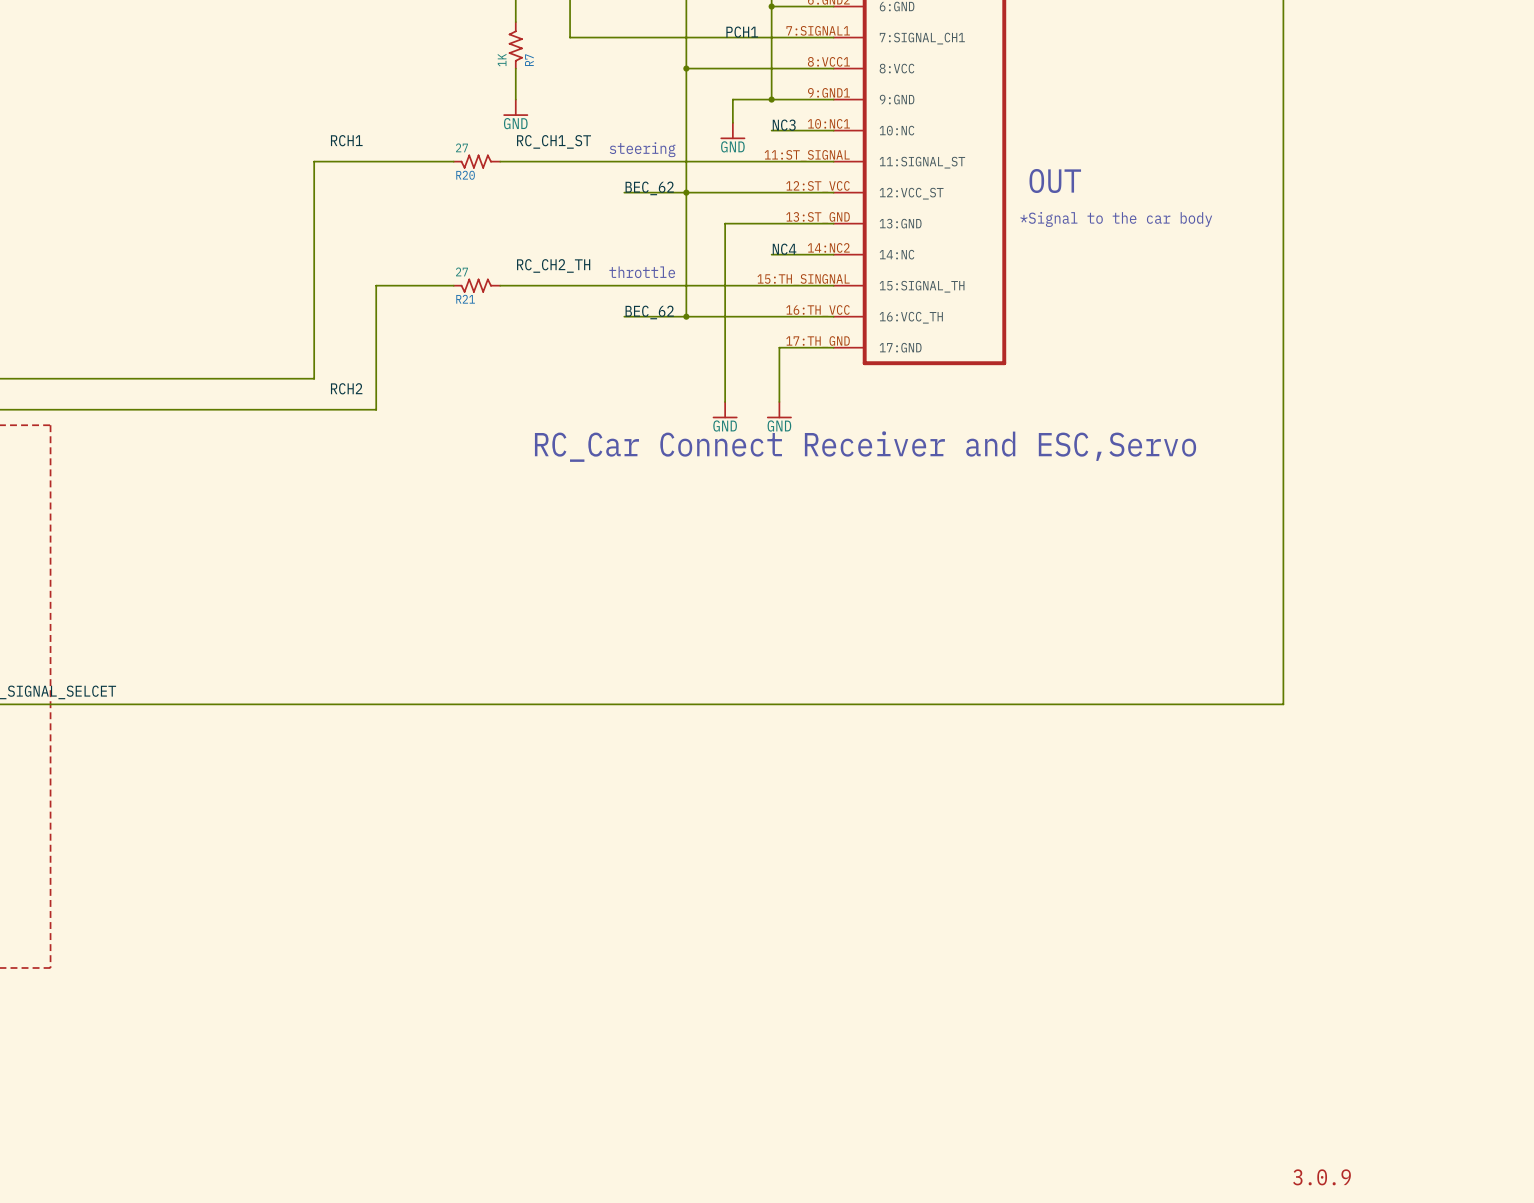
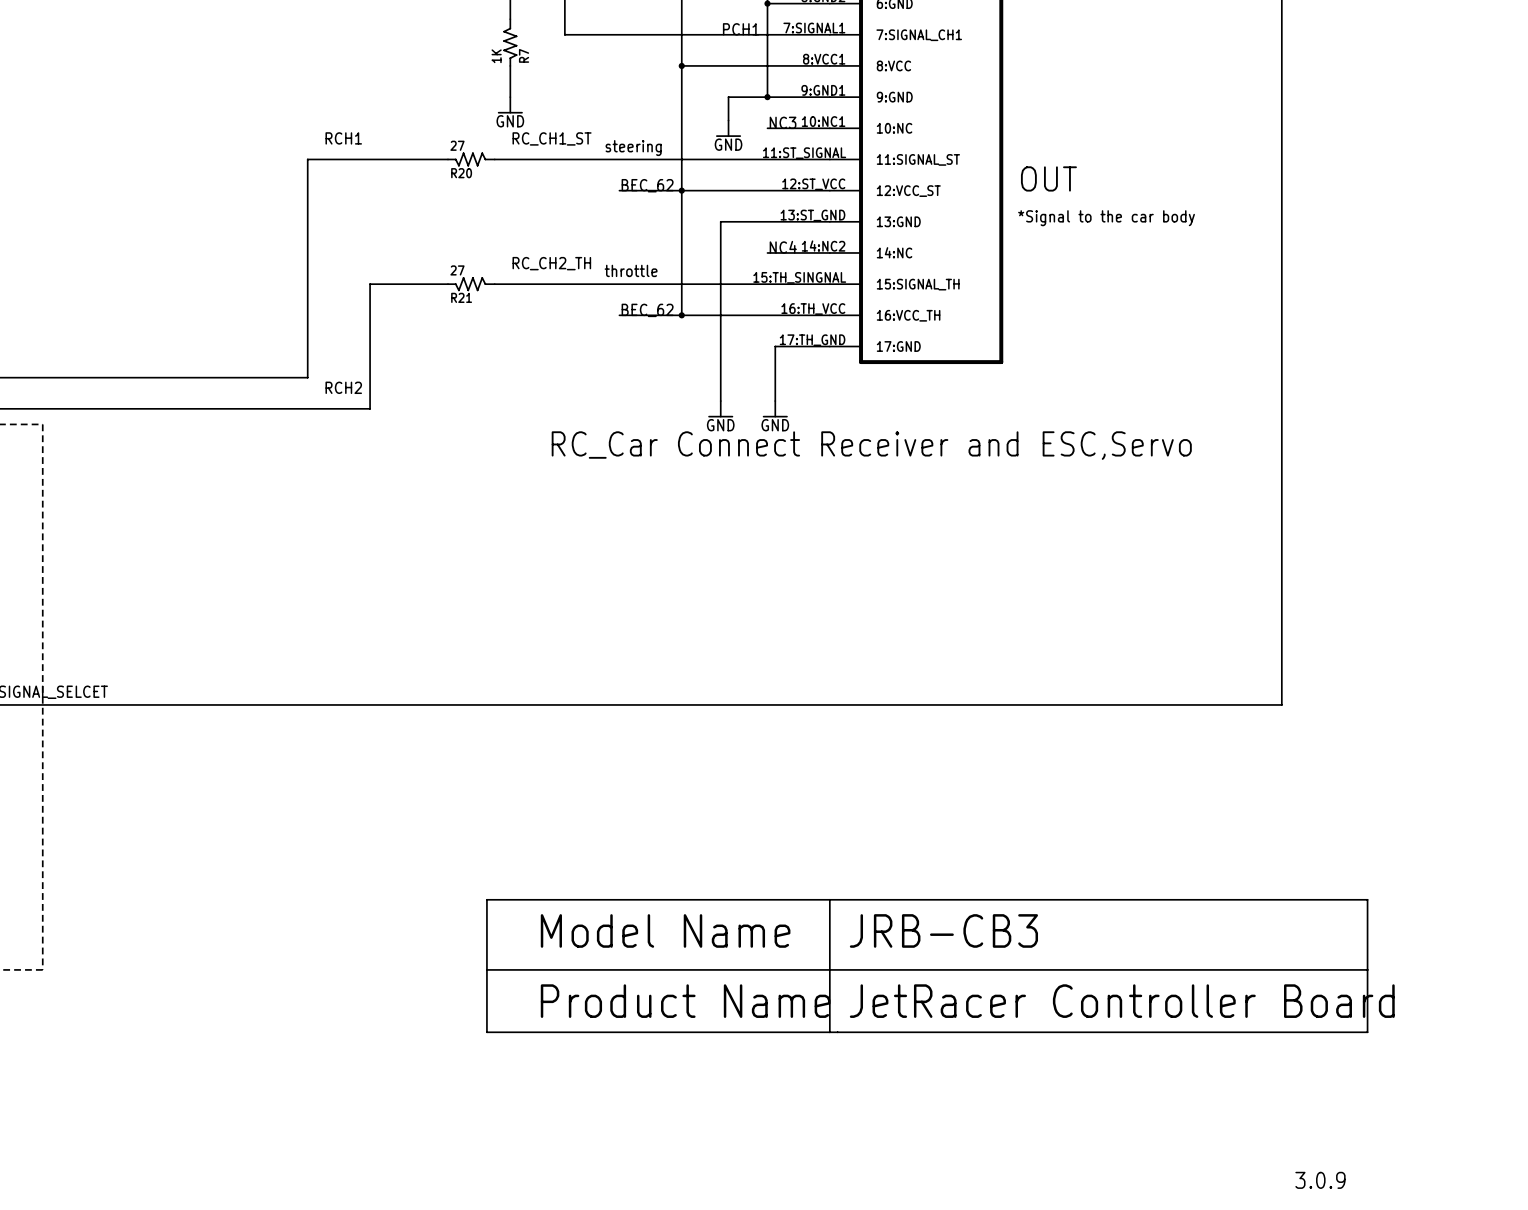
line: none -> (486, 899) (486, 1032) (1367, 1032) (1367, 899) (486, 899)
line: none -> (829, 899) (829, 1032)
text: none -> Model Name (665, 930)
text: none -> JRB-CB3 (943, 930)
line: none -> (486, 969) (1367, 969)
text: none -> Product Name (685, 1001)
text: none -> JetRacer Controller Board (1122, 1001)

